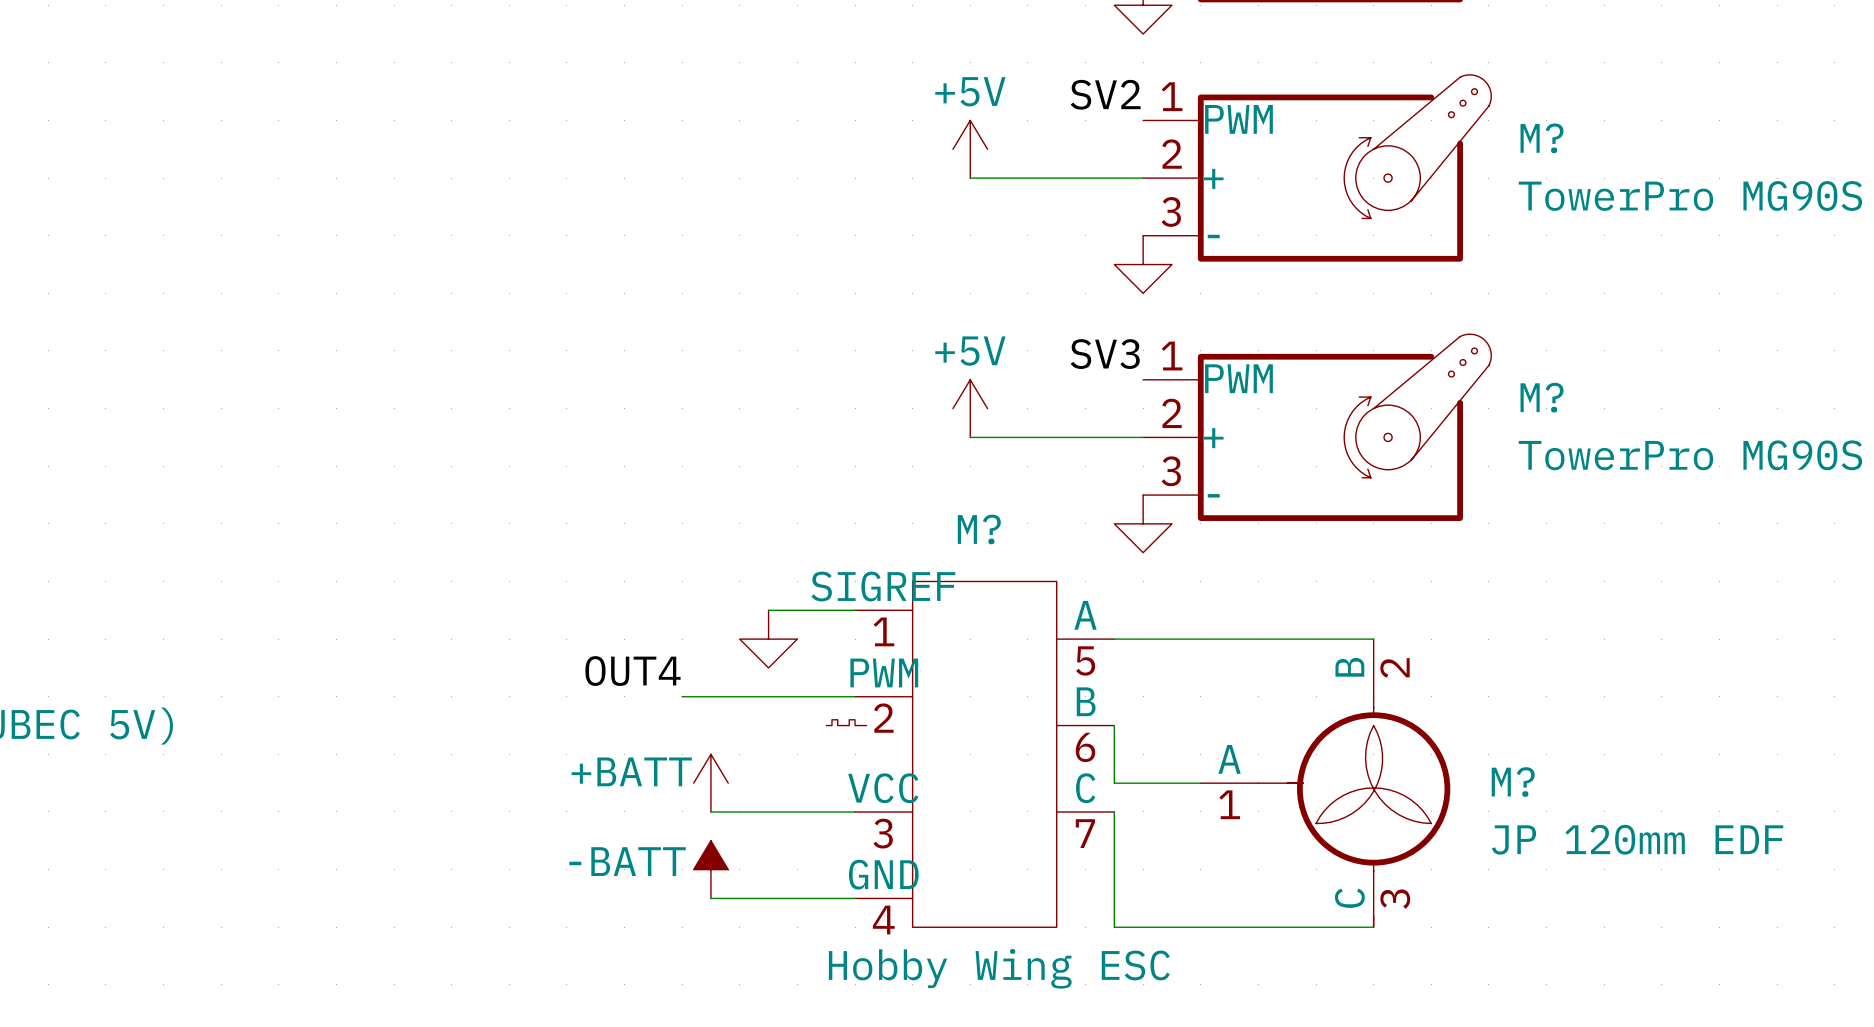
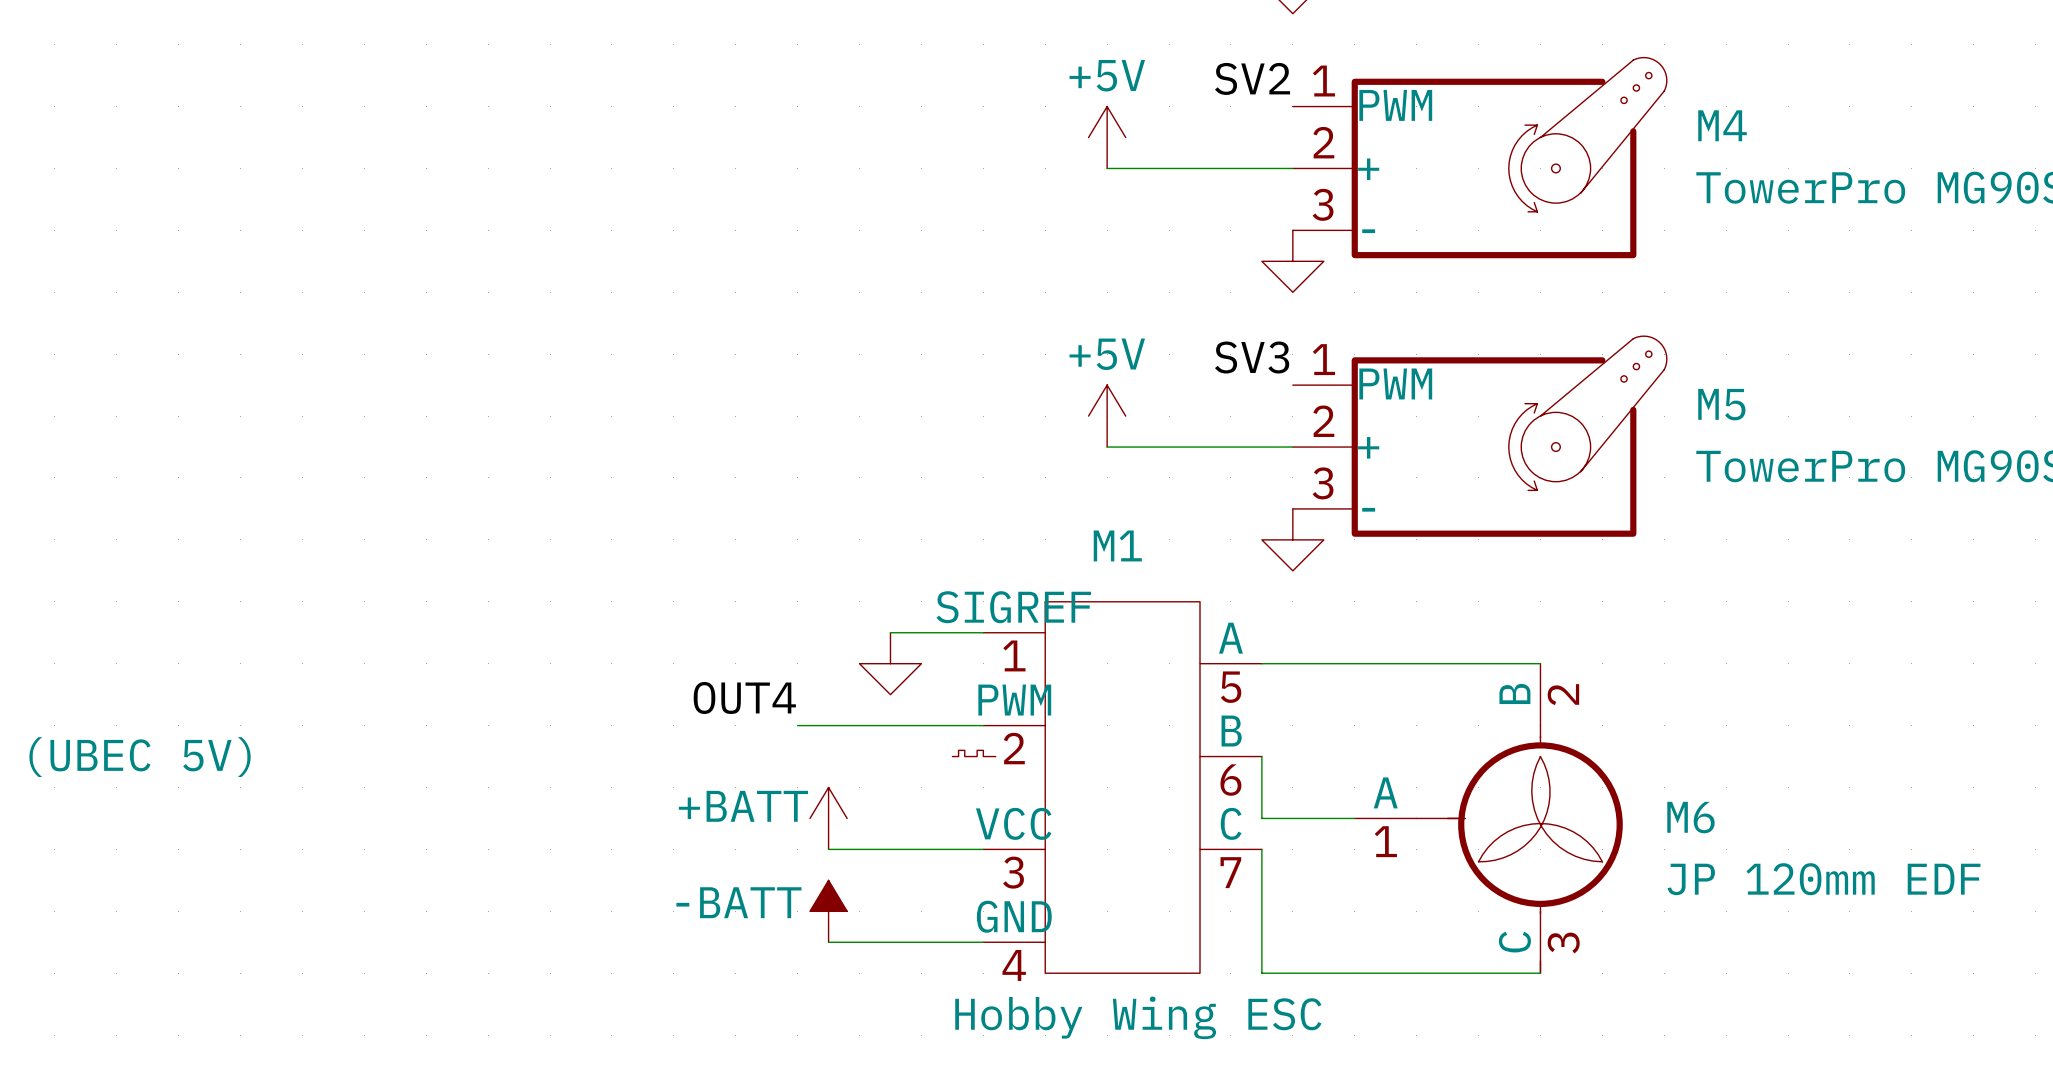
M? name: M? (1542, 138) -> M4 (1722, 125)
M? name: M? (1542, 397) -> M5 (1721, 404)
M? name: M? (979, 529) -> M1 (1117, 545)
M? name: M? (1513, 782) -> M6 (1690, 817)

